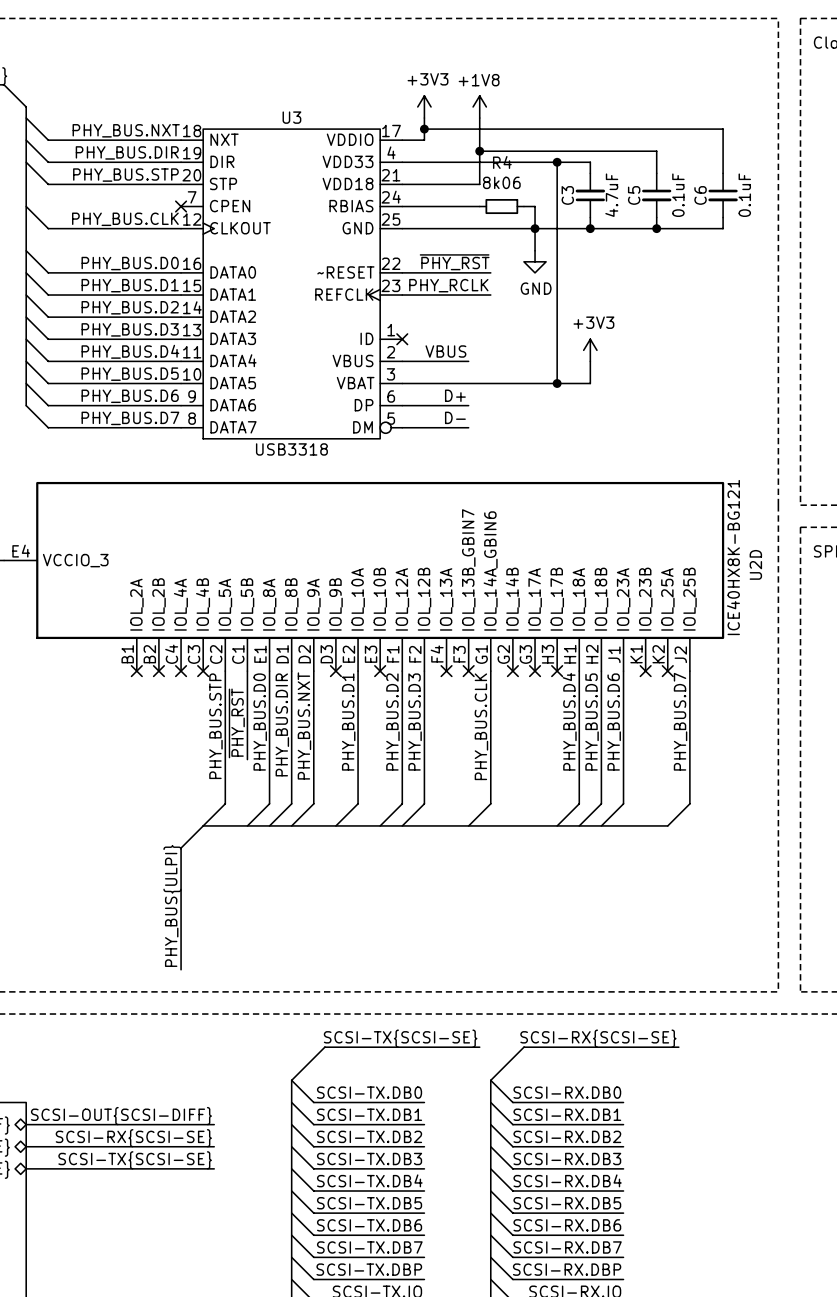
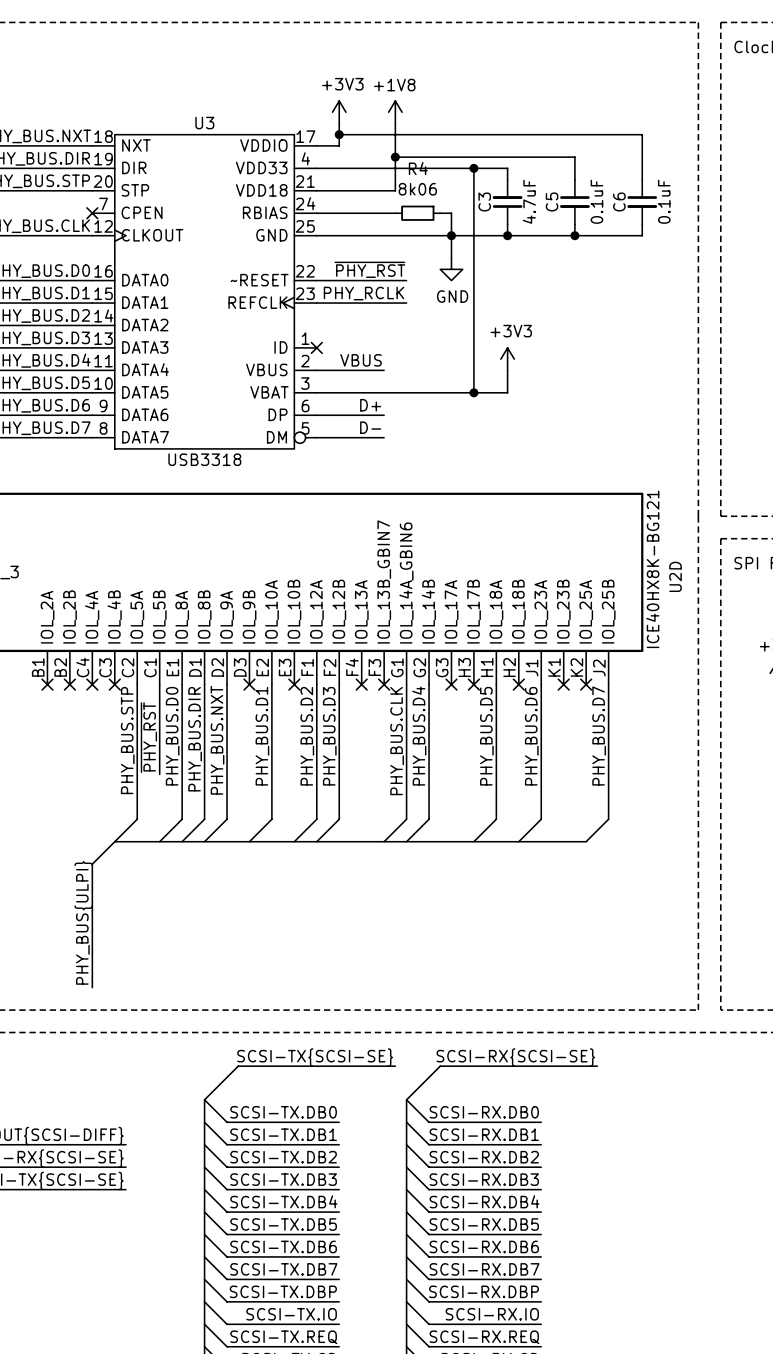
no-connect mark: (512, 671) -> none
wire: (601, 671) (601, 803) (579, 825) -> (429, 684) (429, 819) (406, 841)
no-connect mark: none -> (518, 684)
label: none -> PHY_BUS.D4 (419, 735)
label: PHY_BUS.D4 (569, 721) -> PHY_BUS.D5 (486, 736)
label: PHY_BUS.D5 (592, 722) -> none

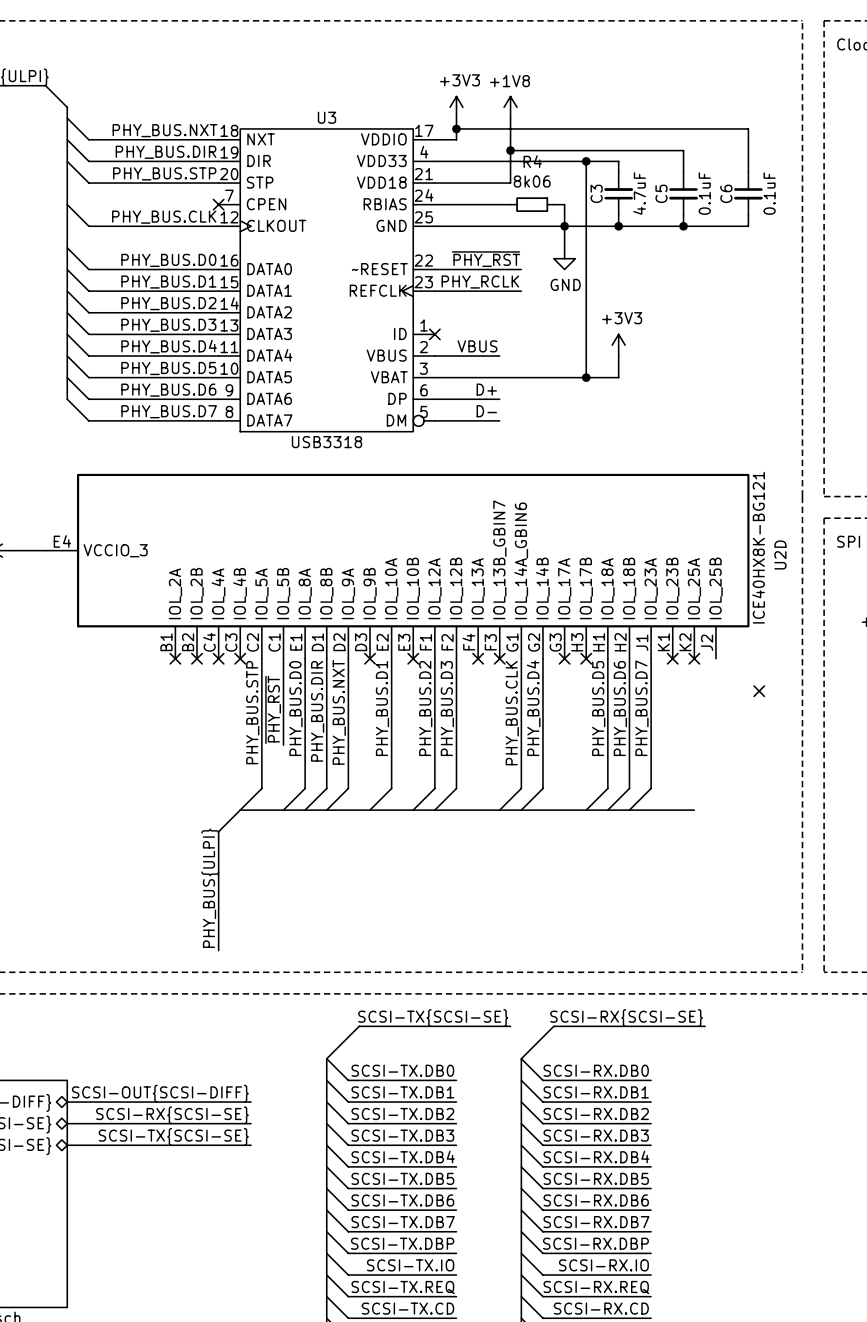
no-connect mark: (518, 684) -> none
wire: (608, 684) (608, 819) (586, 841) -> (629, 658) (629, 788) (607, 810)
no-connect mark: none -> (759, 691)
label: PHY_BUS.D7 (599, 735) -> none
label: none -> PHY_BUS.D6 (620, 708)
label: PHY_BUS.D6 (531, 736) -> PHY_BUS.D7 (641, 708)

